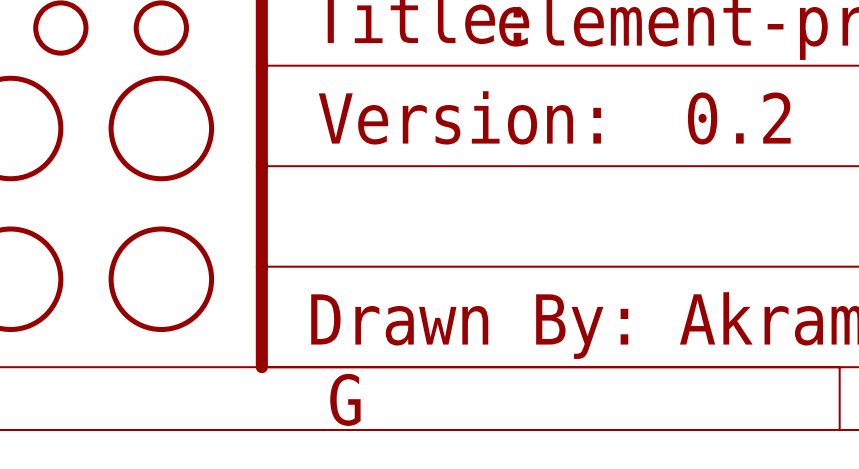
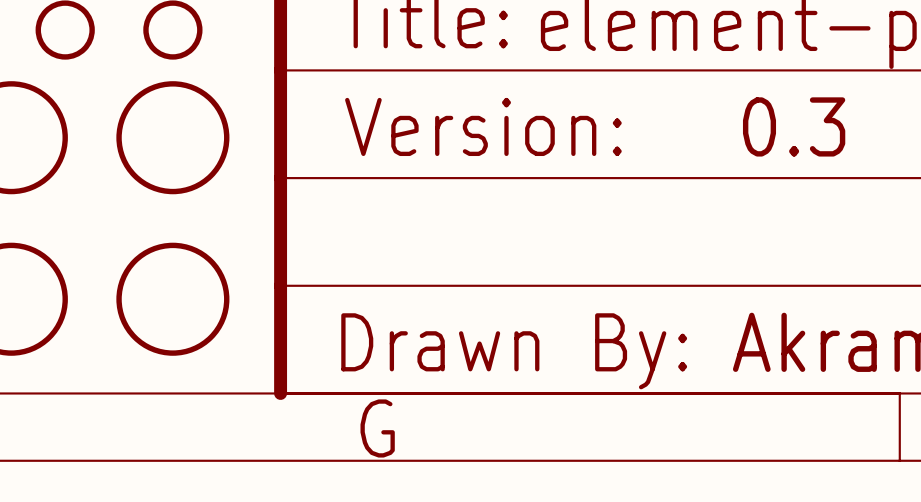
text: 0.2 (739, 118) -> 0.3 (794, 126)

